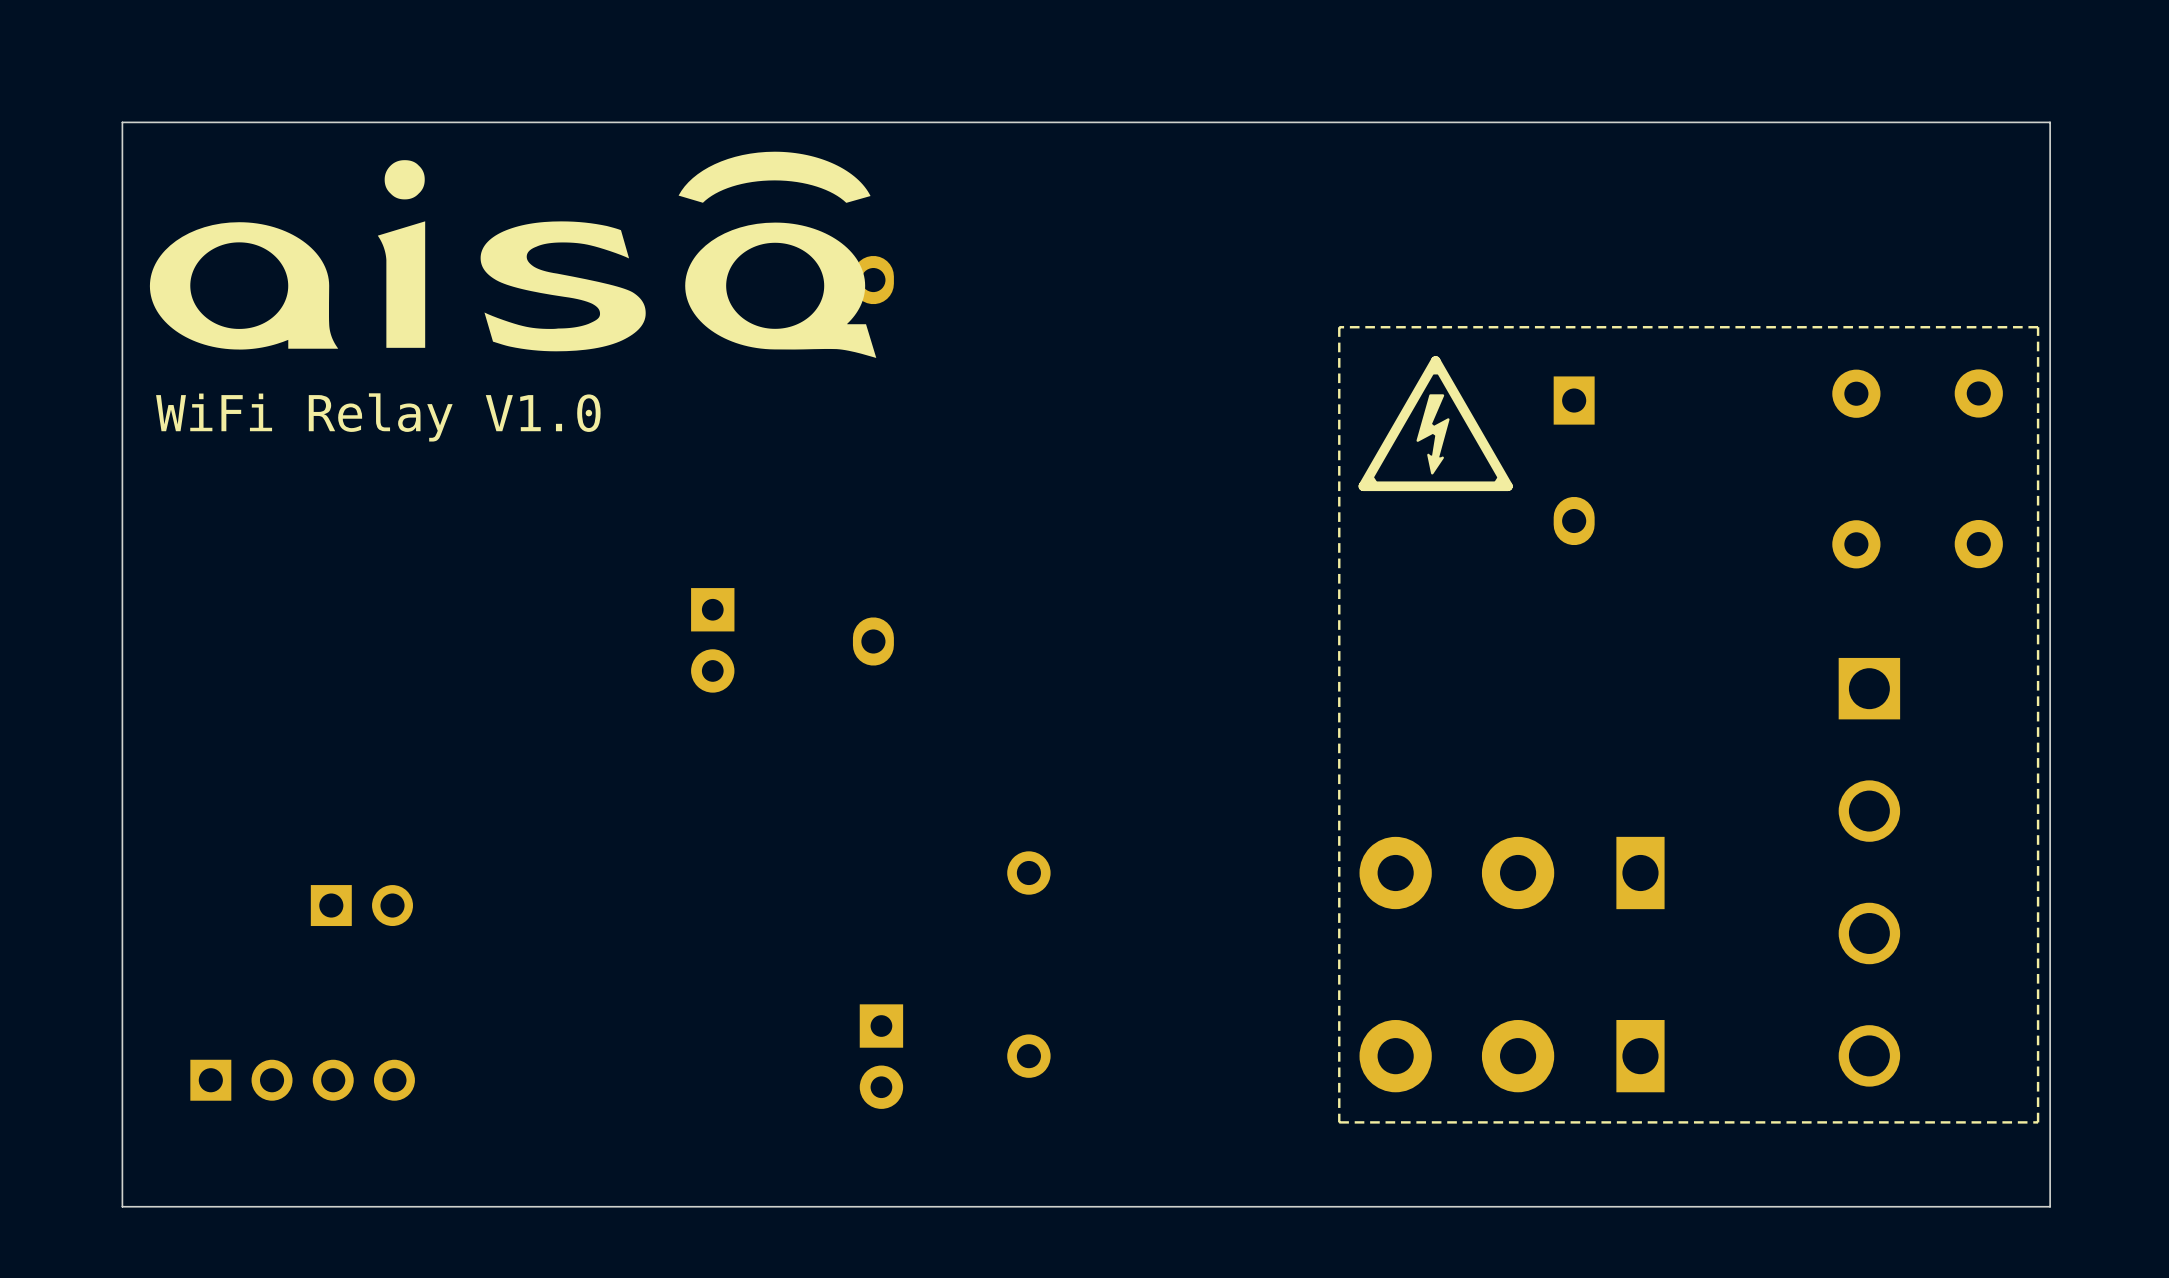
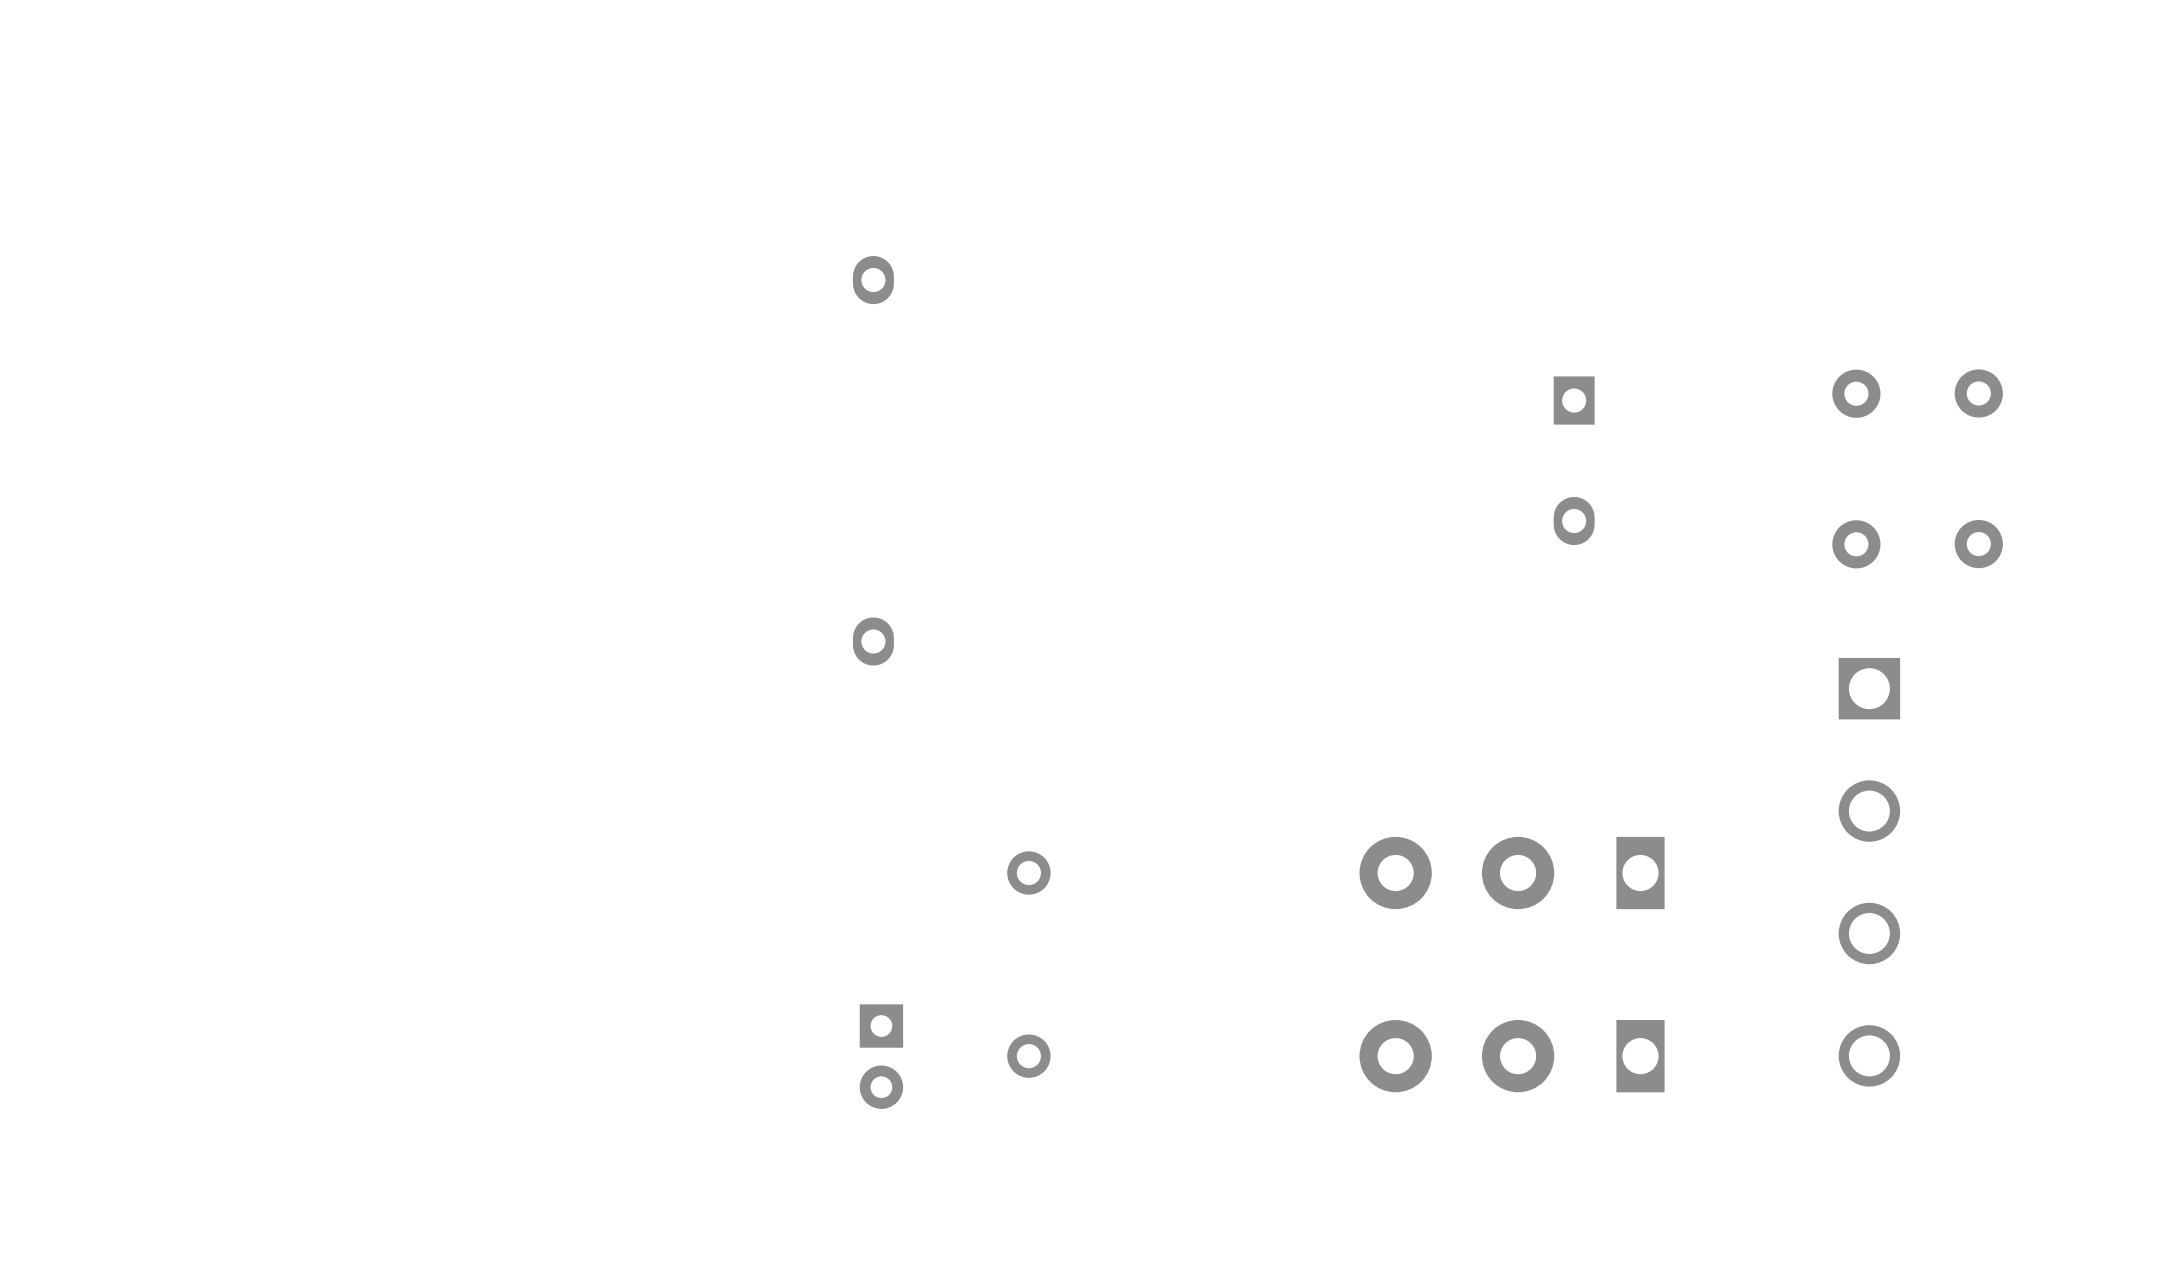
board edge: (2050, 122) (122, 122) (122, 1206) (2050, 1206) (2050, 122) -> none
drawing: [678, 151, 877, 358] -> none
drawing: [377, 160, 426, 348] -> none
drawing: [480, 221, 646, 352] -> none
drawing: [149, 222, 339, 350] -> none
line: (2038, 327) (1339, 327) (1339, 1122) (2038, 1122) (2038, 327) -> none
drawing: [1358, 356, 1513, 492] -> none
text: WiFi Relay V1.0 (378, 417) -> none
part: (712, 640) -> none
part: (361, 905) -> none
part: (302, 1080) -> none

